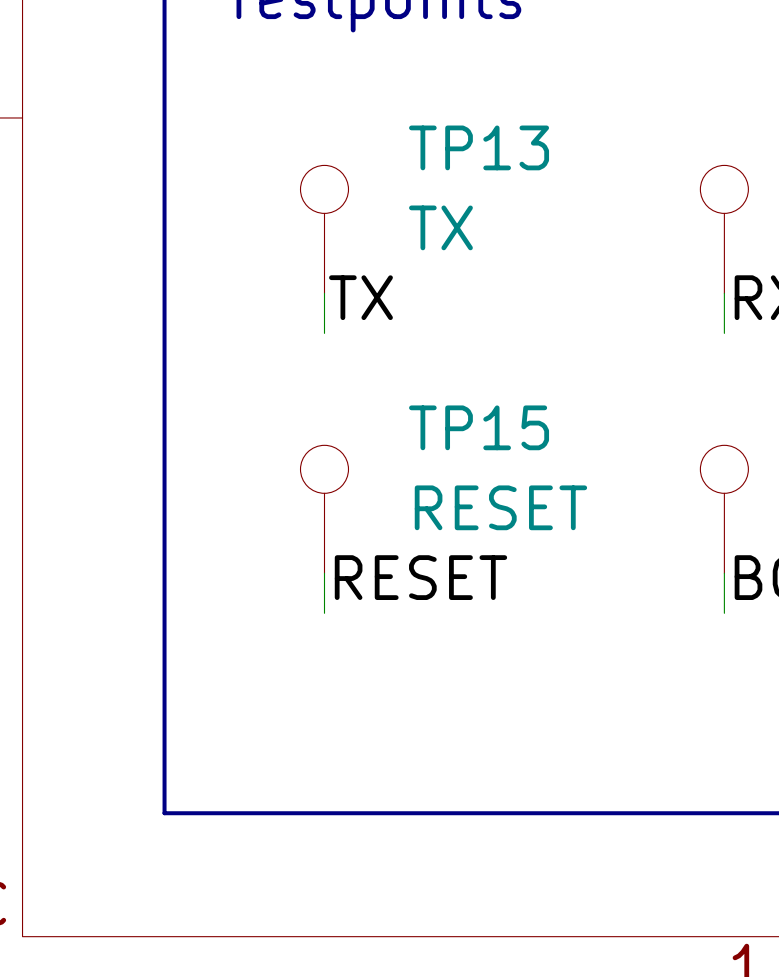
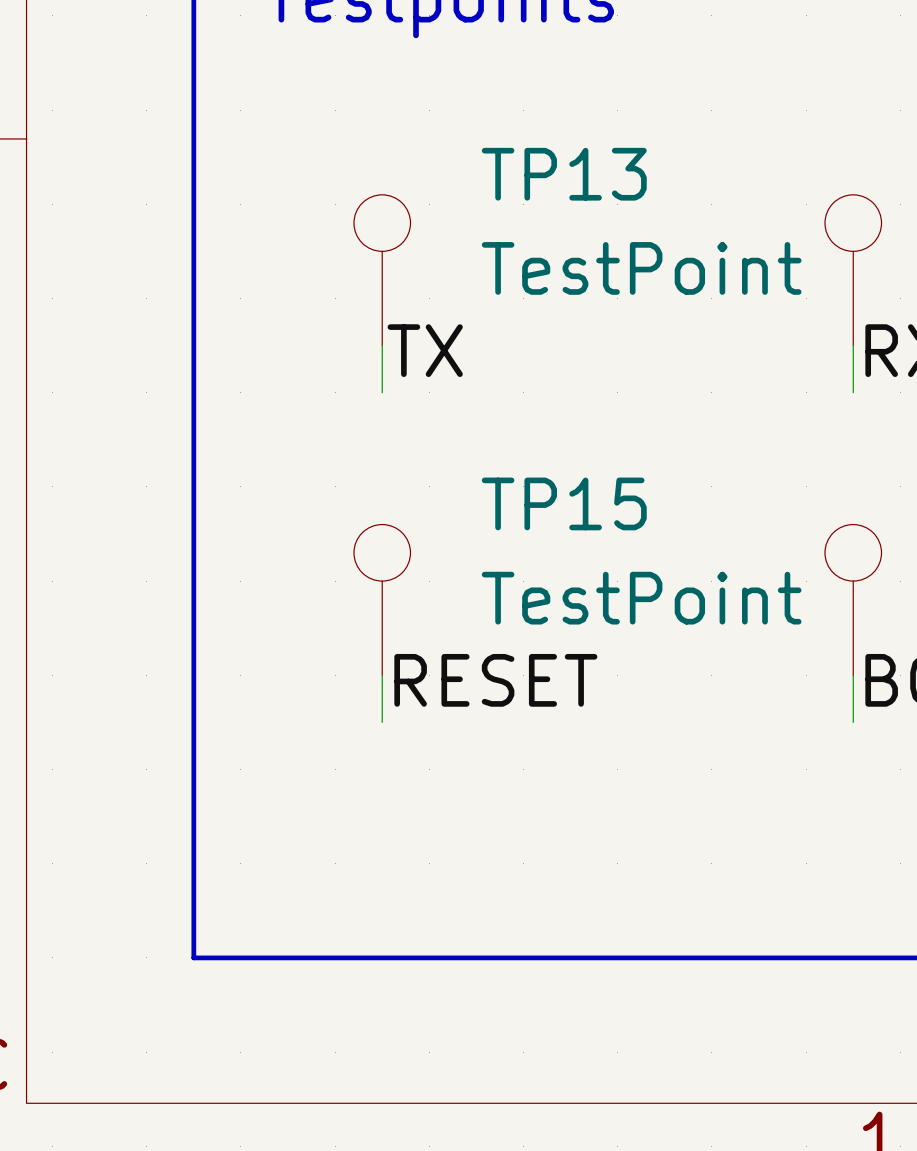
TP13 value: TX (440, 227) -> TestPoint (641, 268)
TP15 value: RESET (500, 507) -> TestPoint (641, 598)

